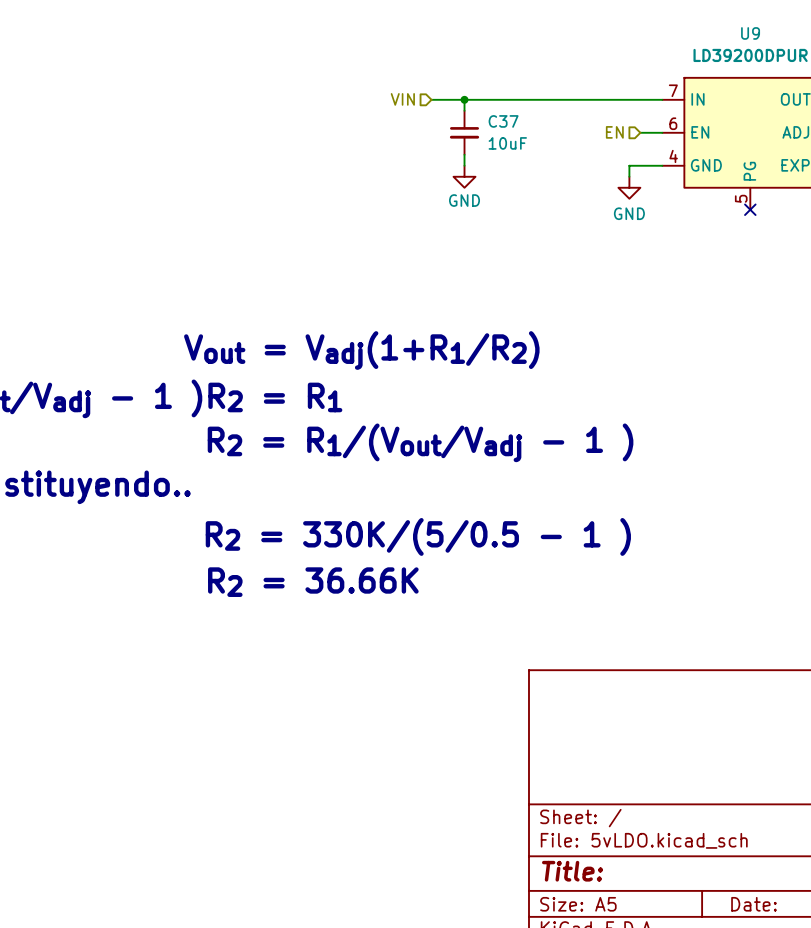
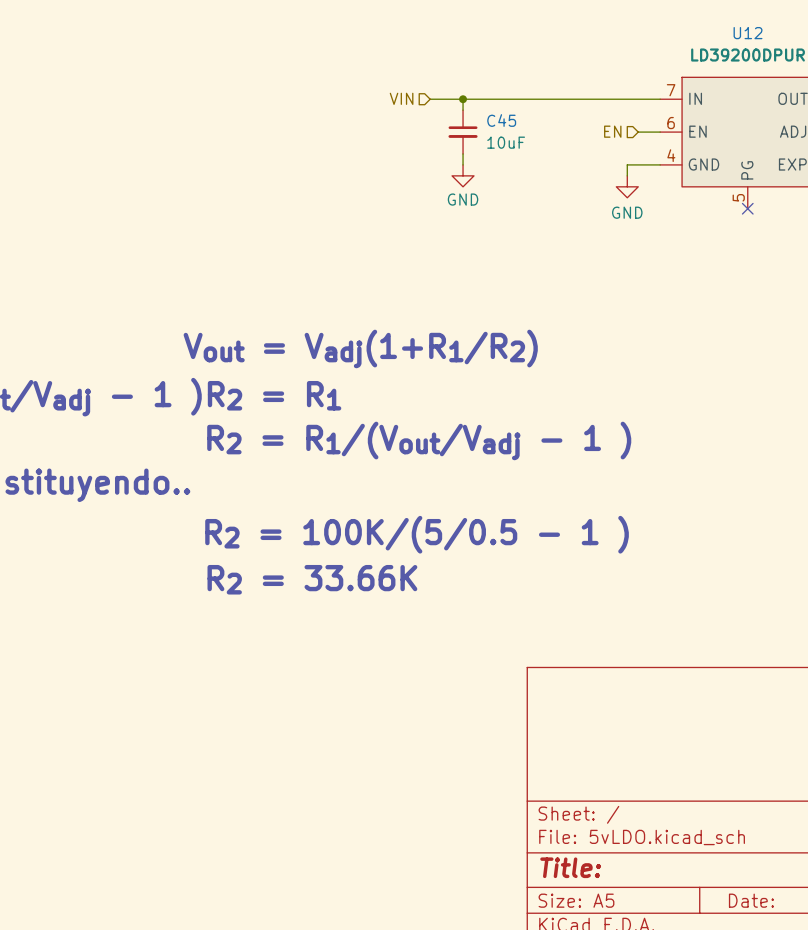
U9 name: U9 (750, 33) -> U12 (748, 33)
C37 name: C37 (503, 121) -> C45 (501, 120)
text: R2 = 330K/(5/0.5 - 1 ) (418, 536) -> R2 = 100K/(5/0.5 - 1 ) (417, 534)
text: R2 = 36.66K (313, 582) -> R2 = 33.66K (312, 579)

